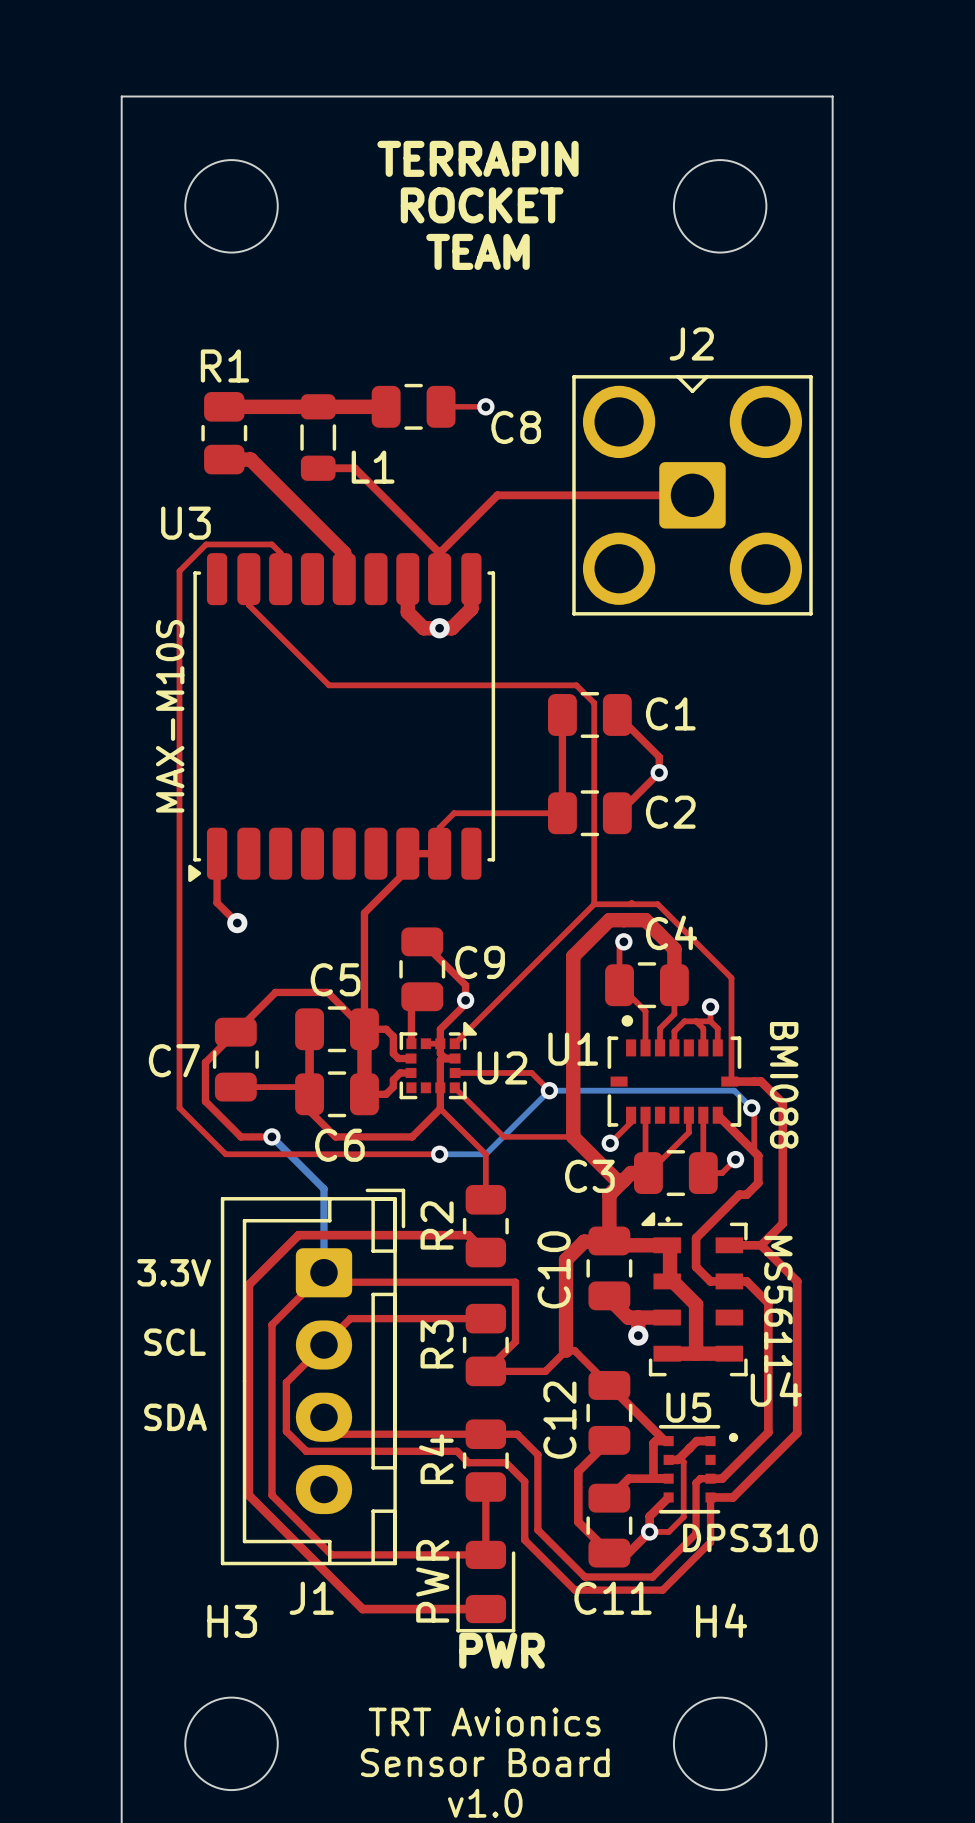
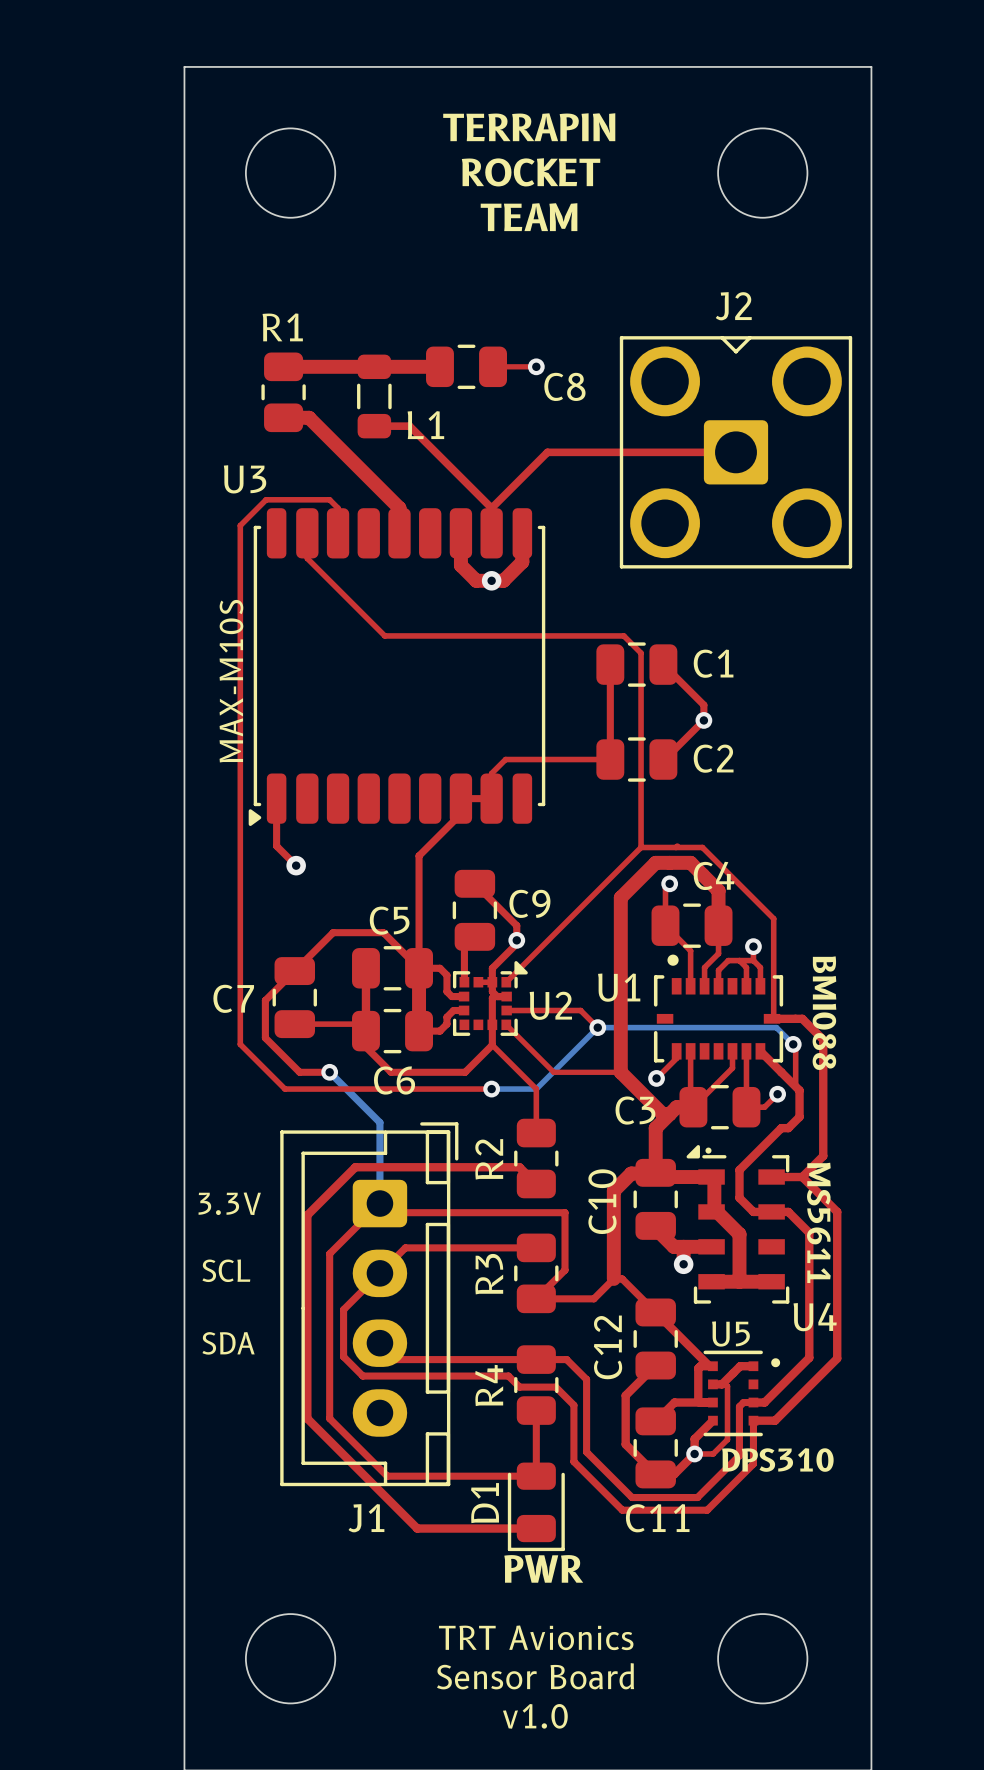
part value: PWR (432, 1581) -> D1 (485, 1503)
H4 name: H4 (721, 1620) -> none
H3 name: H3 (232, 1621) -> none

